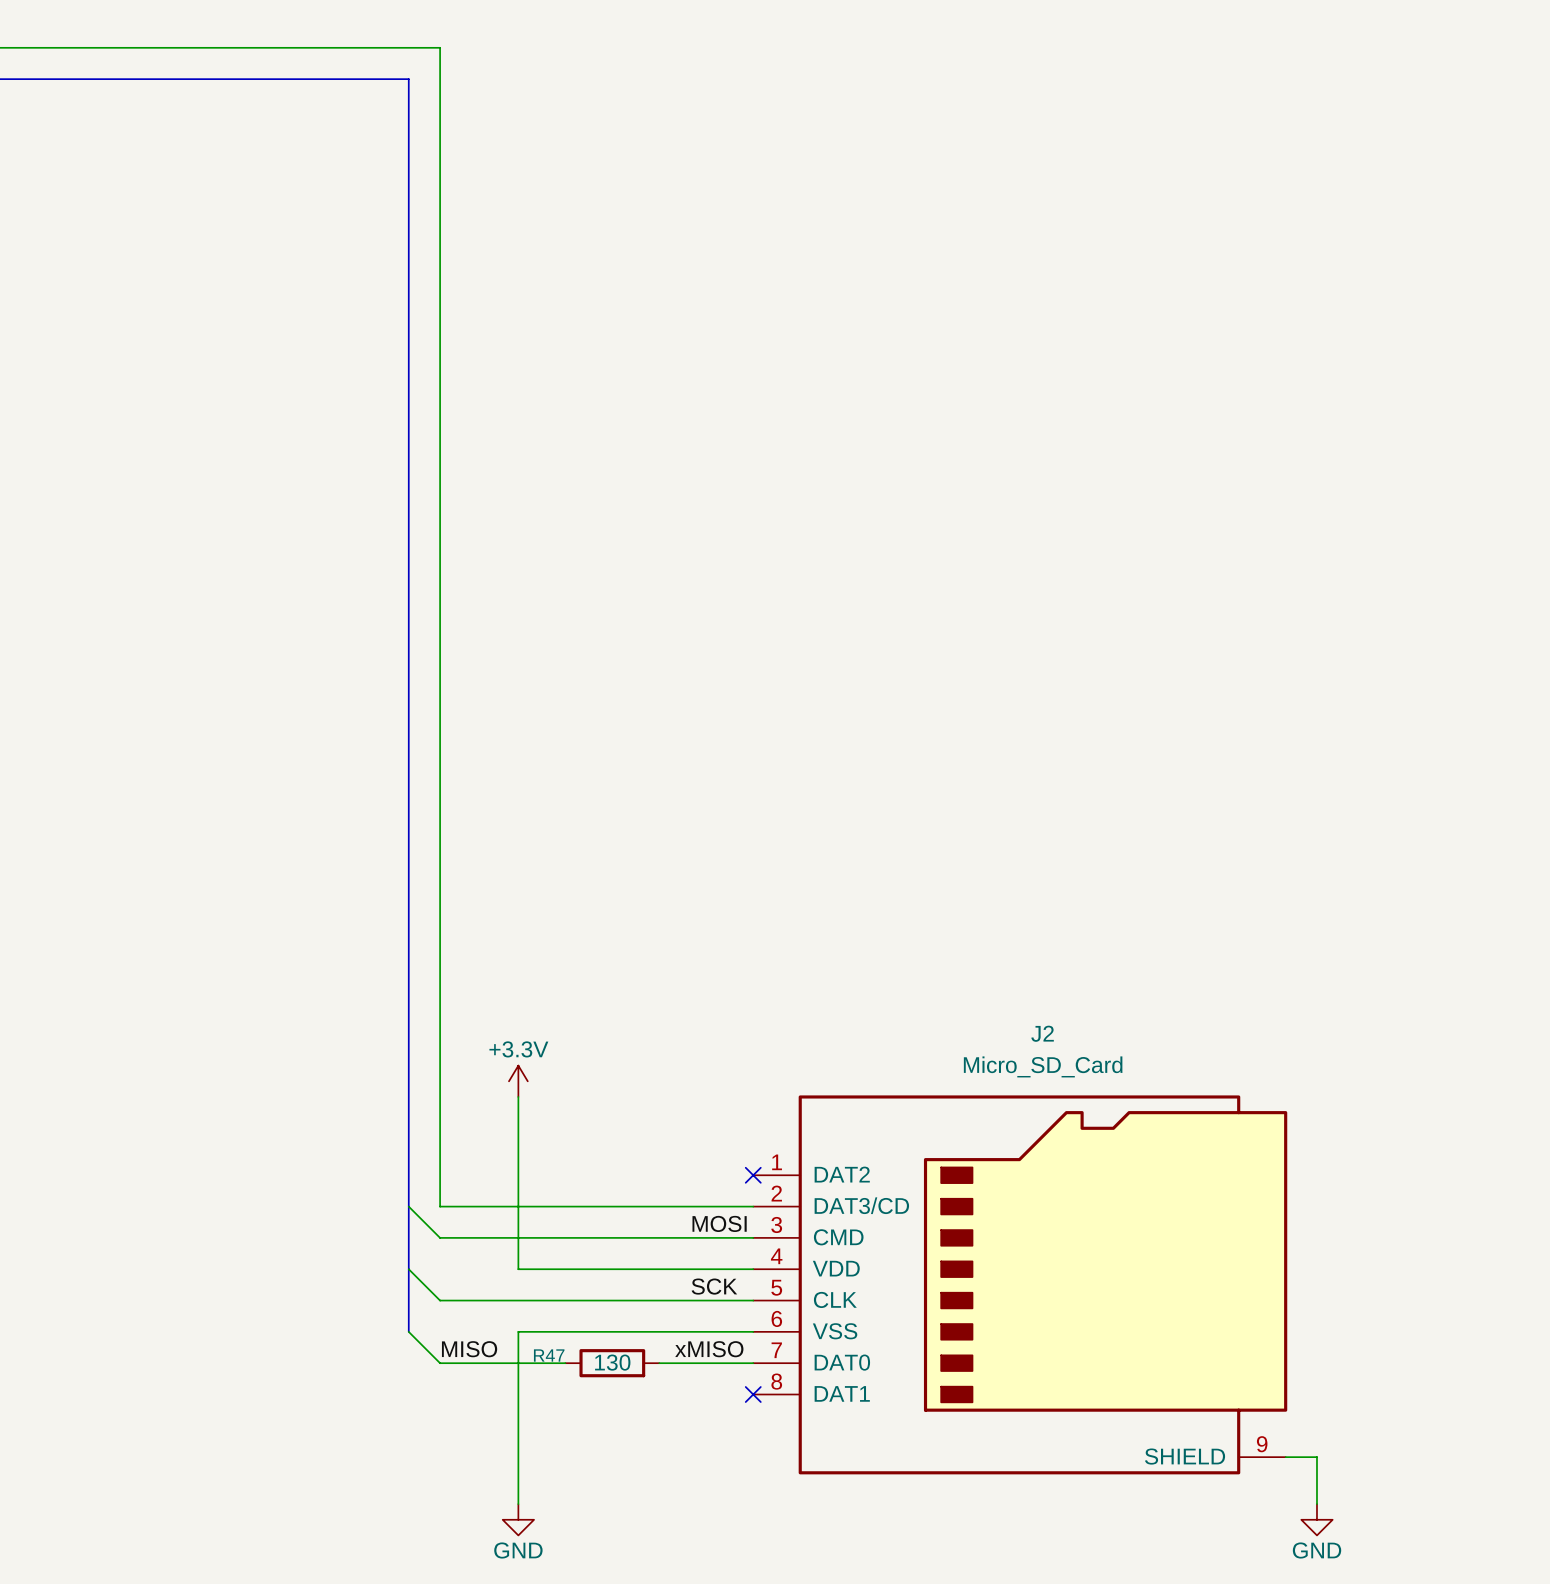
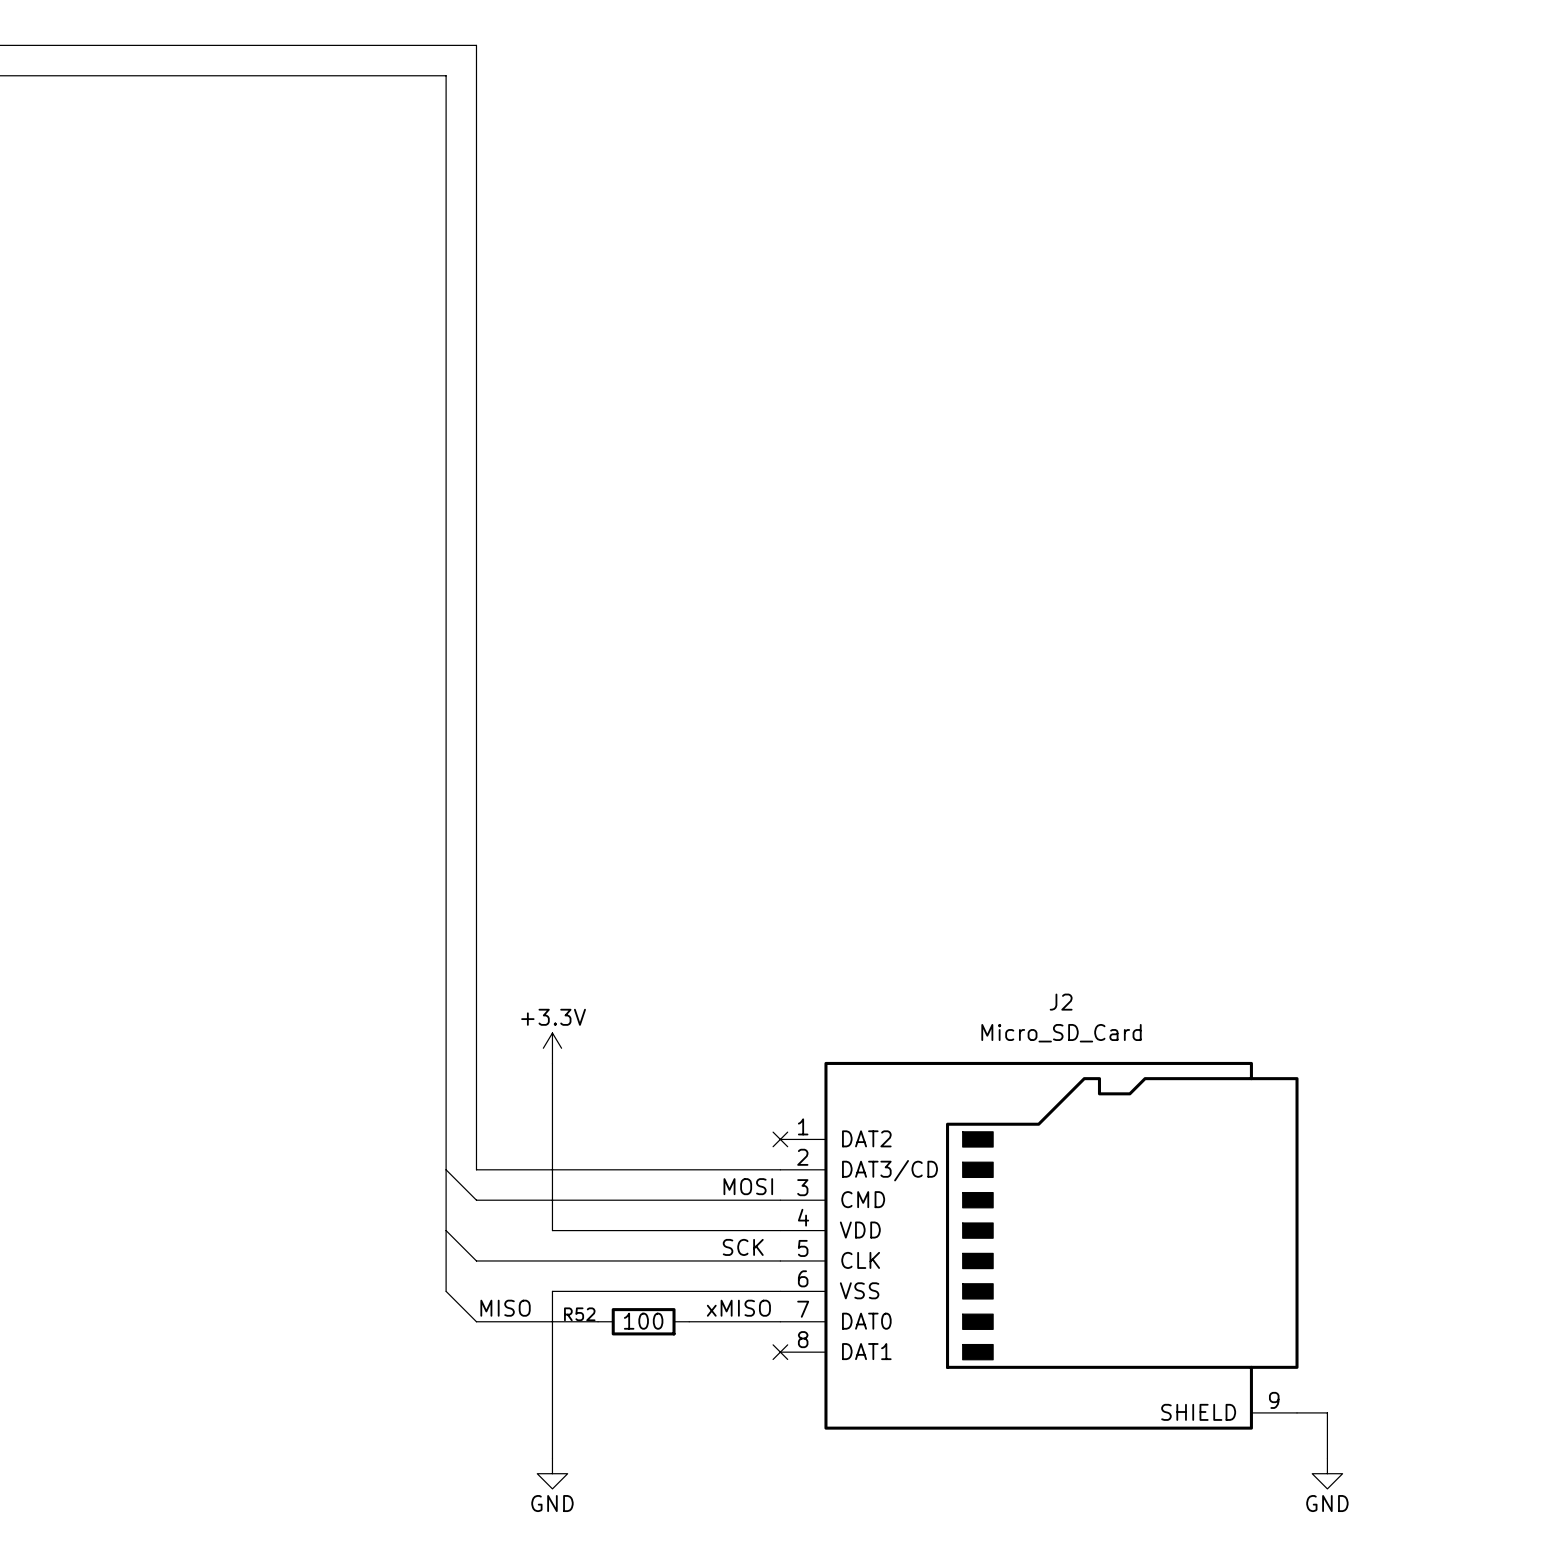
R47 name: R47 (549, 1355) -> R52 (579, 1314)
R47 value: 130 (612, 1362) -> 100 (643, 1321)

